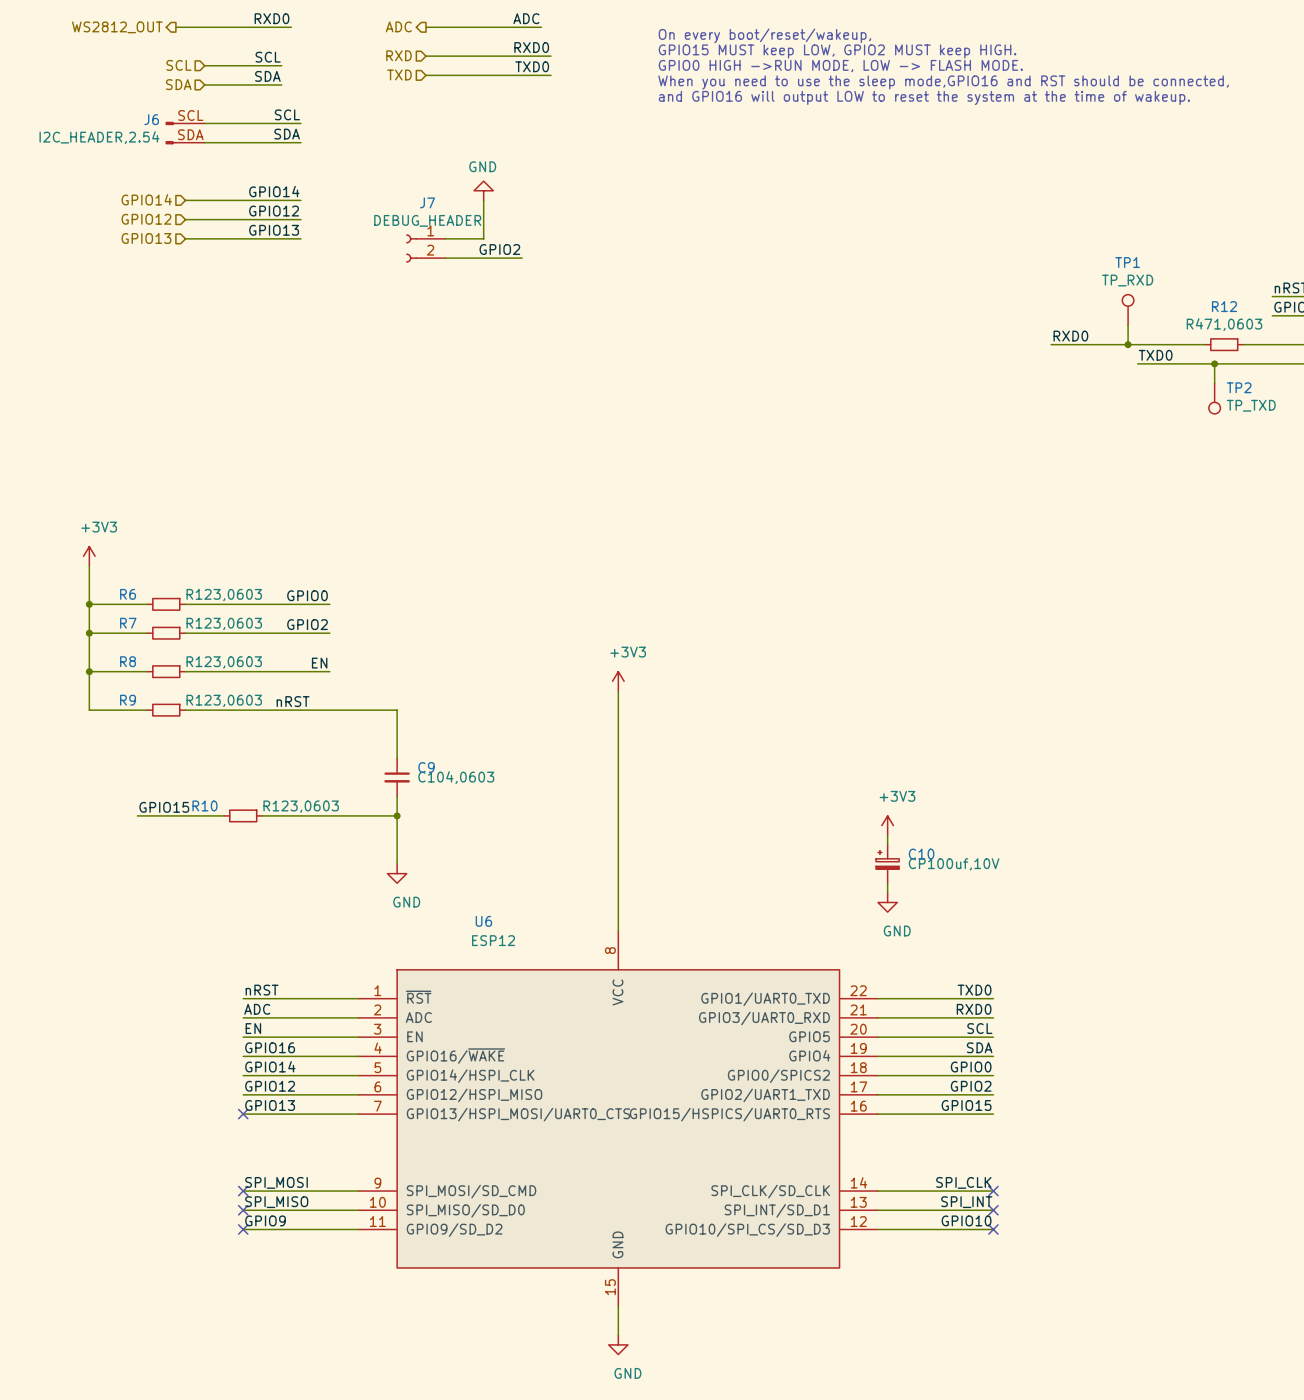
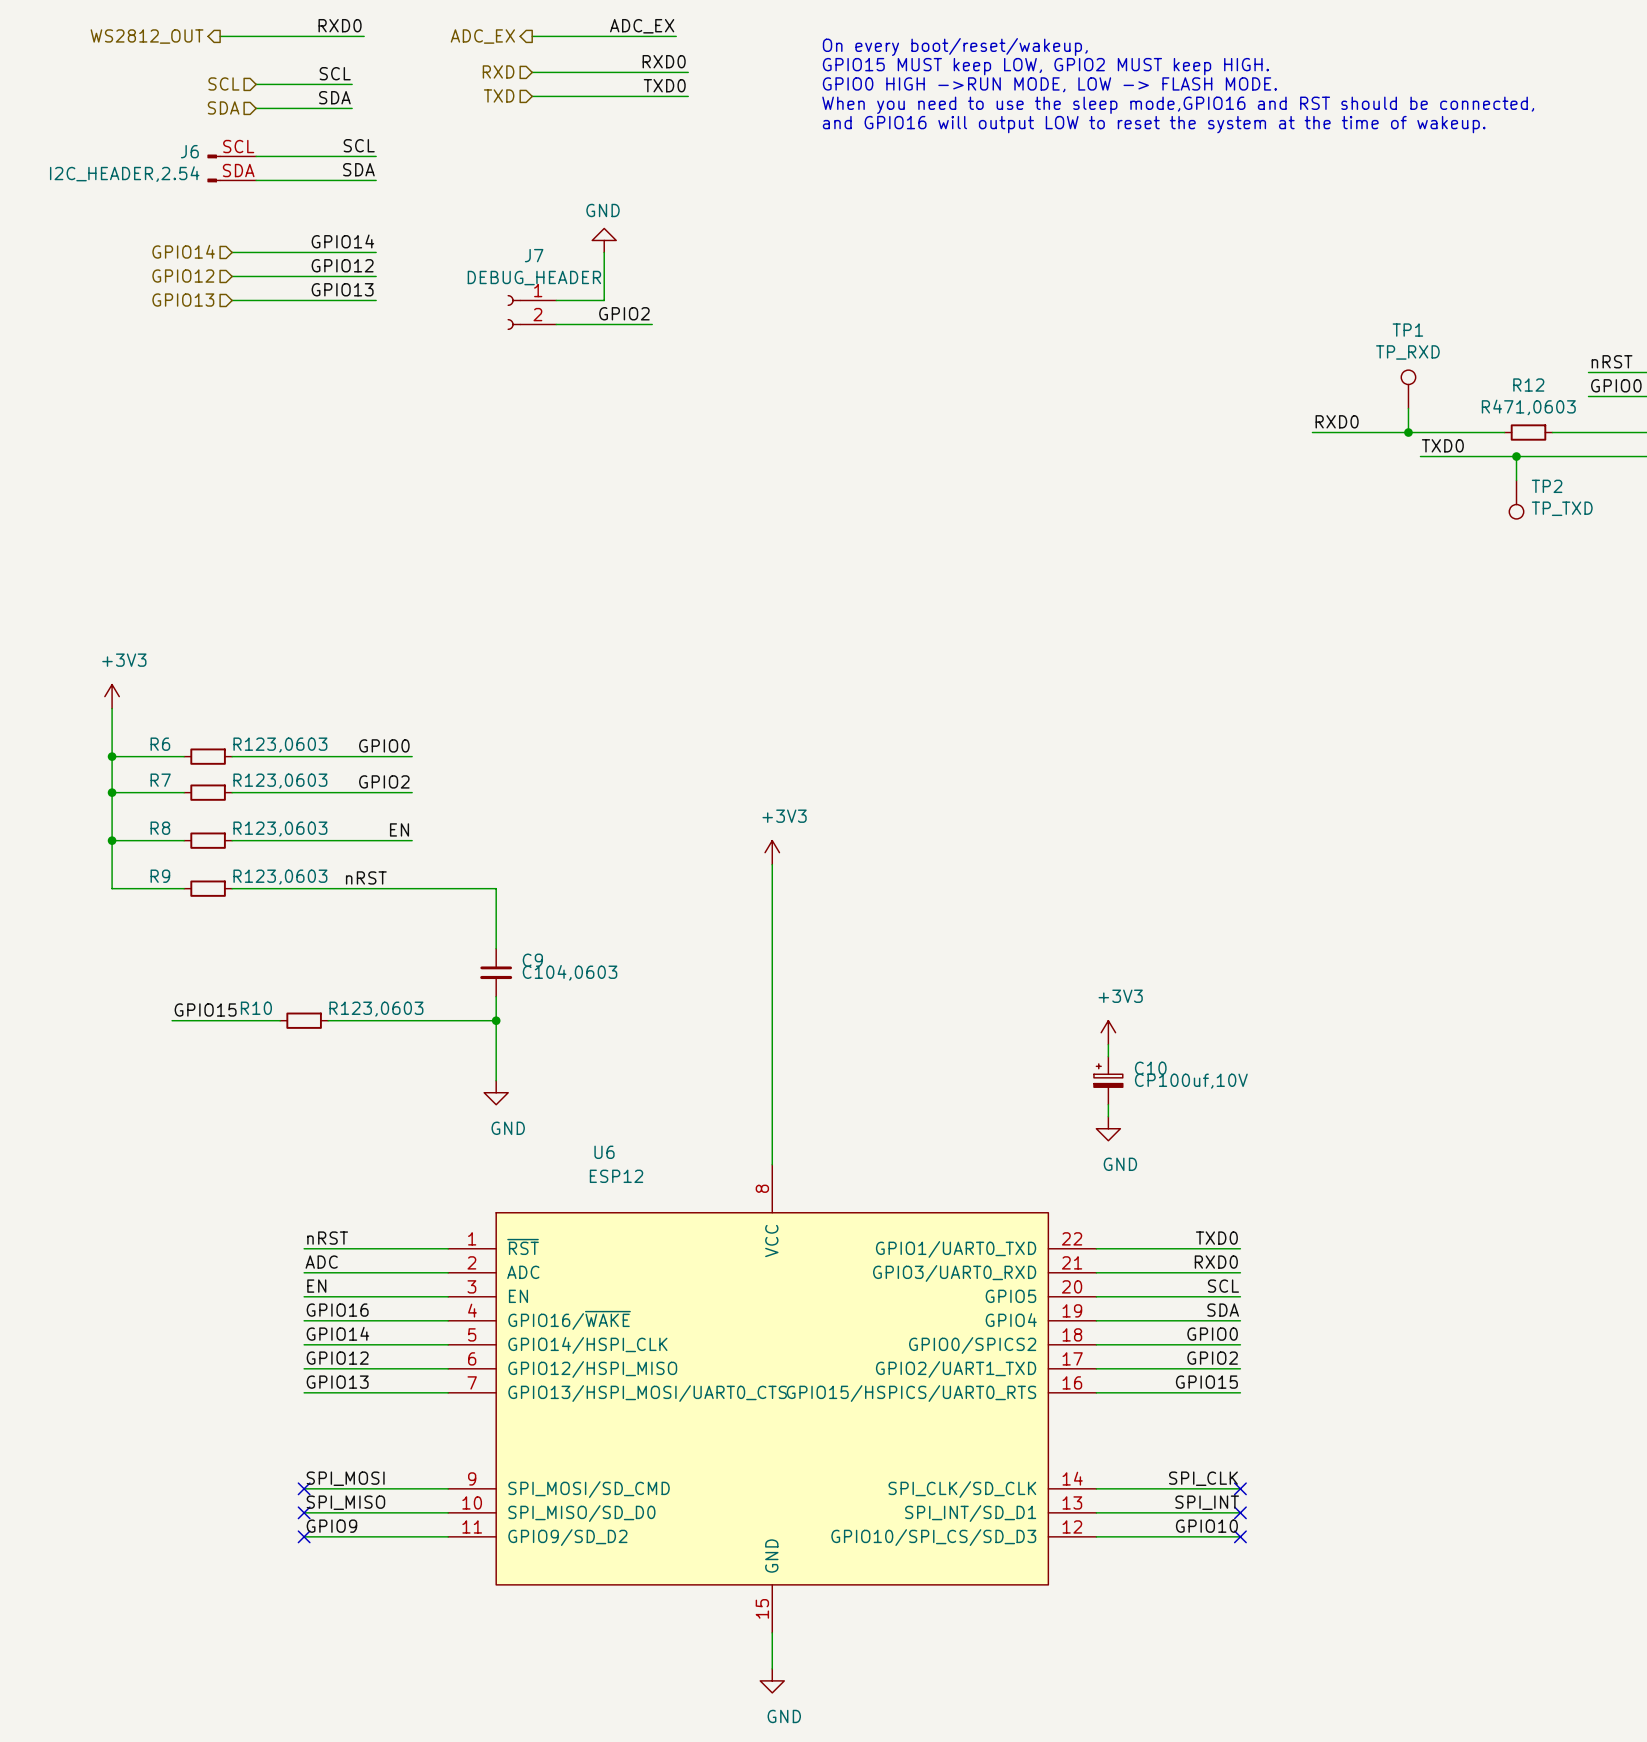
label: ADC (526, 18) -> ADC_EX (642, 26)
hierarchical label: ADC (398, 26) -> ADC_EX (482, 36)
no-connect mark: (243, 1114) -> none

